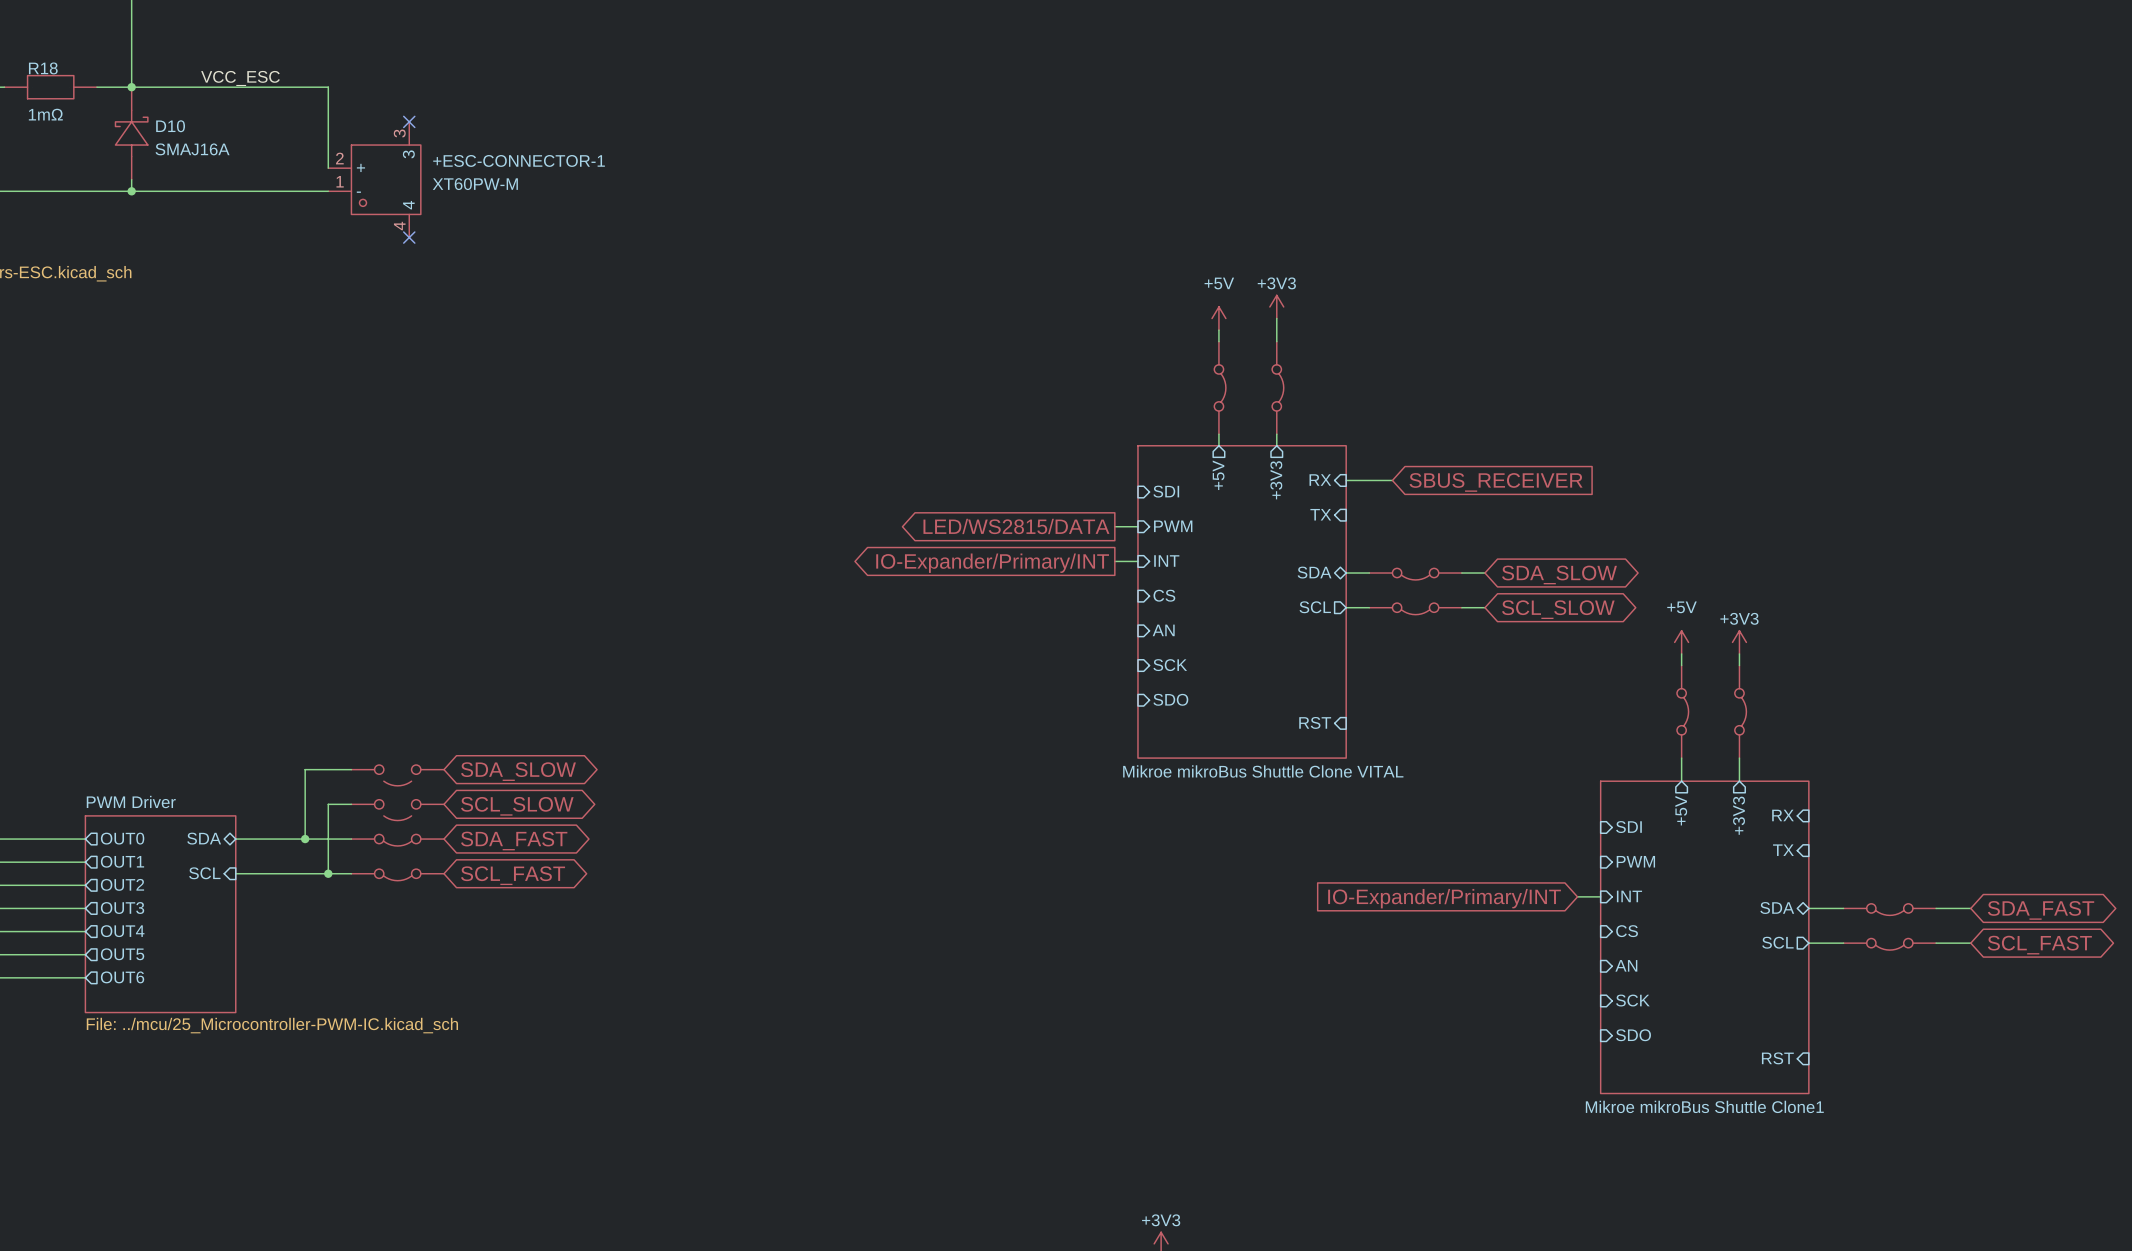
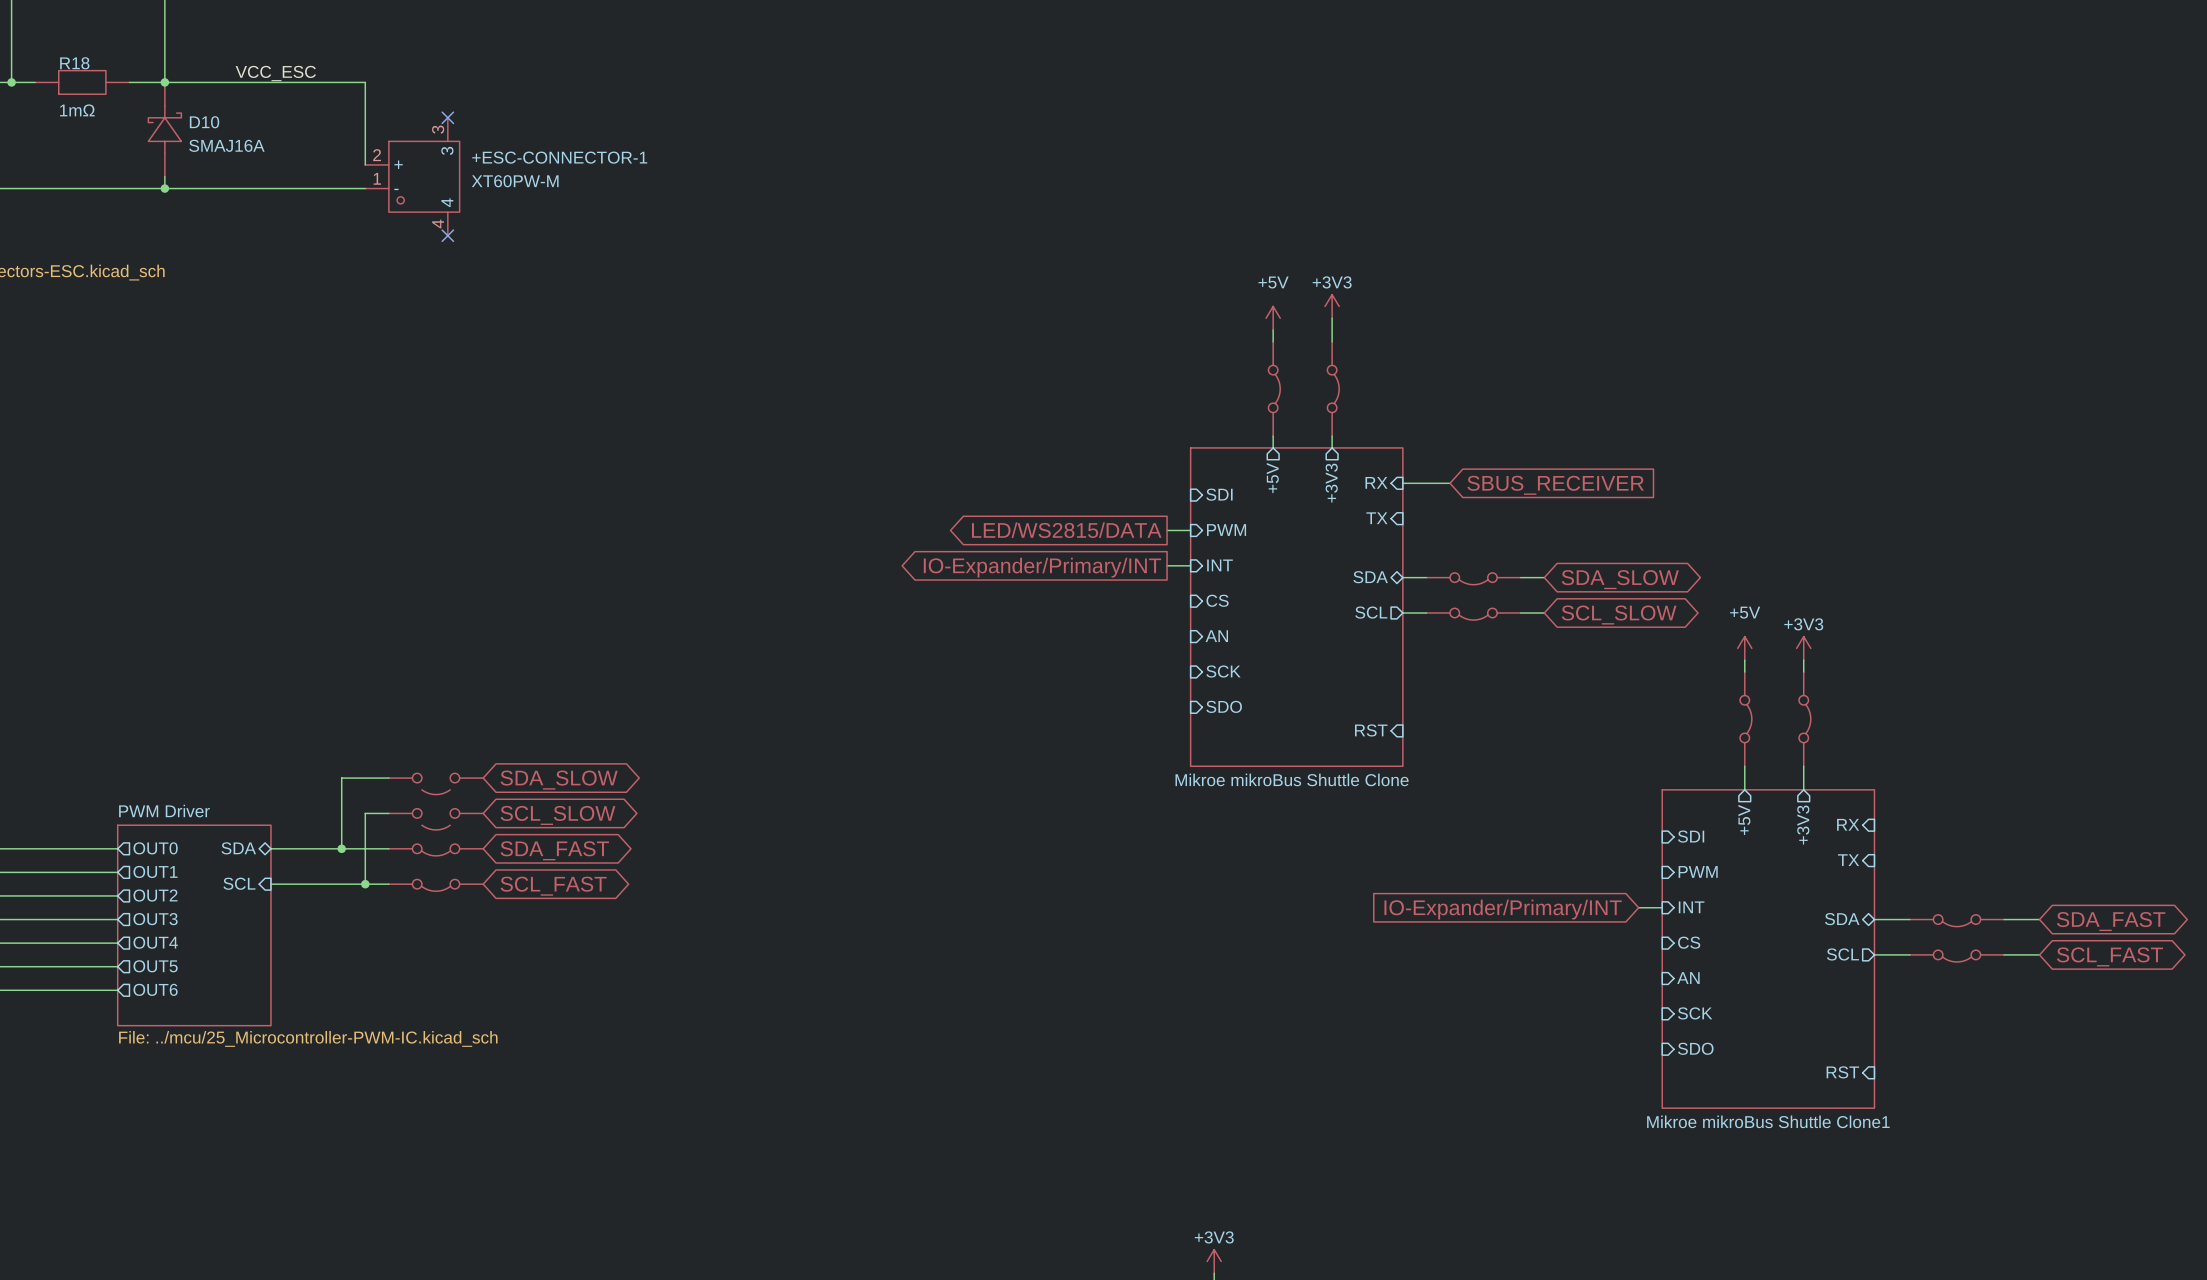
sheet Mikroe mikroBus Shuttle Clone VITAL name: Mikroe mikroBus Shuttle Clone VITAL (1263, 771) -> Mikroe mikroBus Shuttle Clone (1292, 779)

